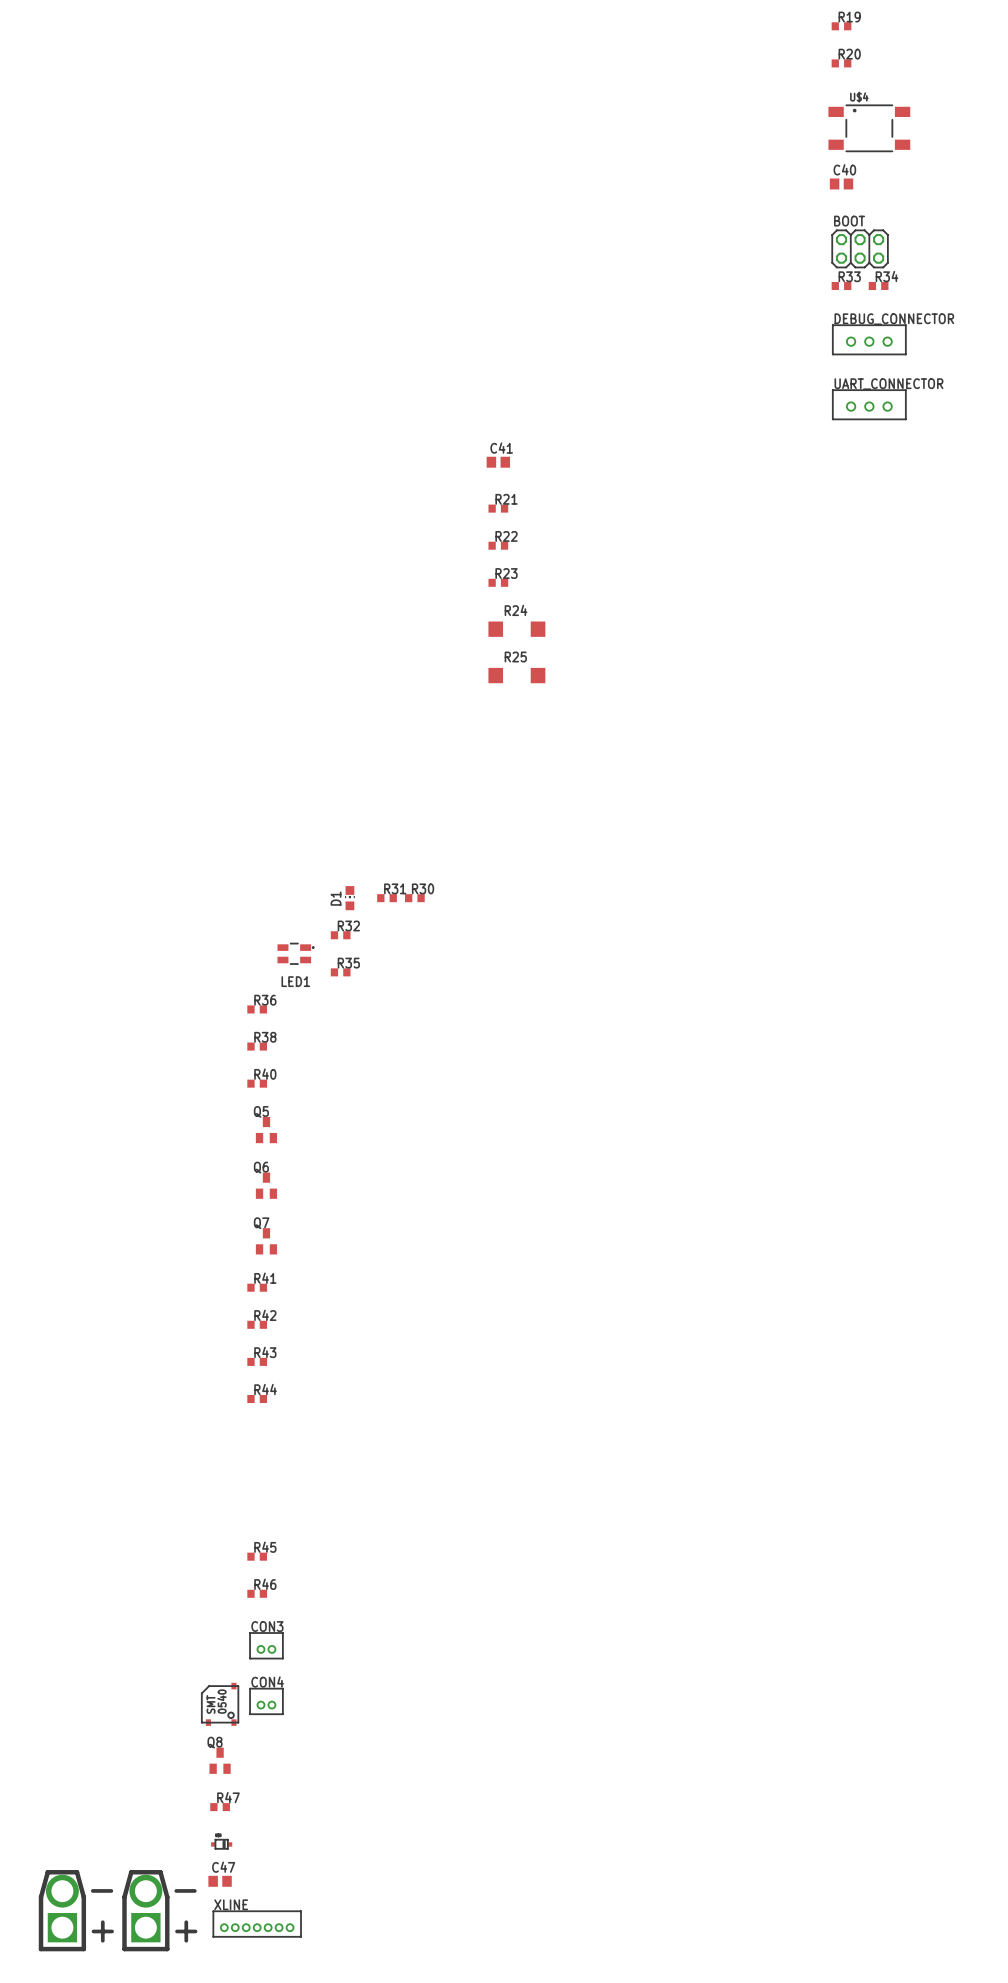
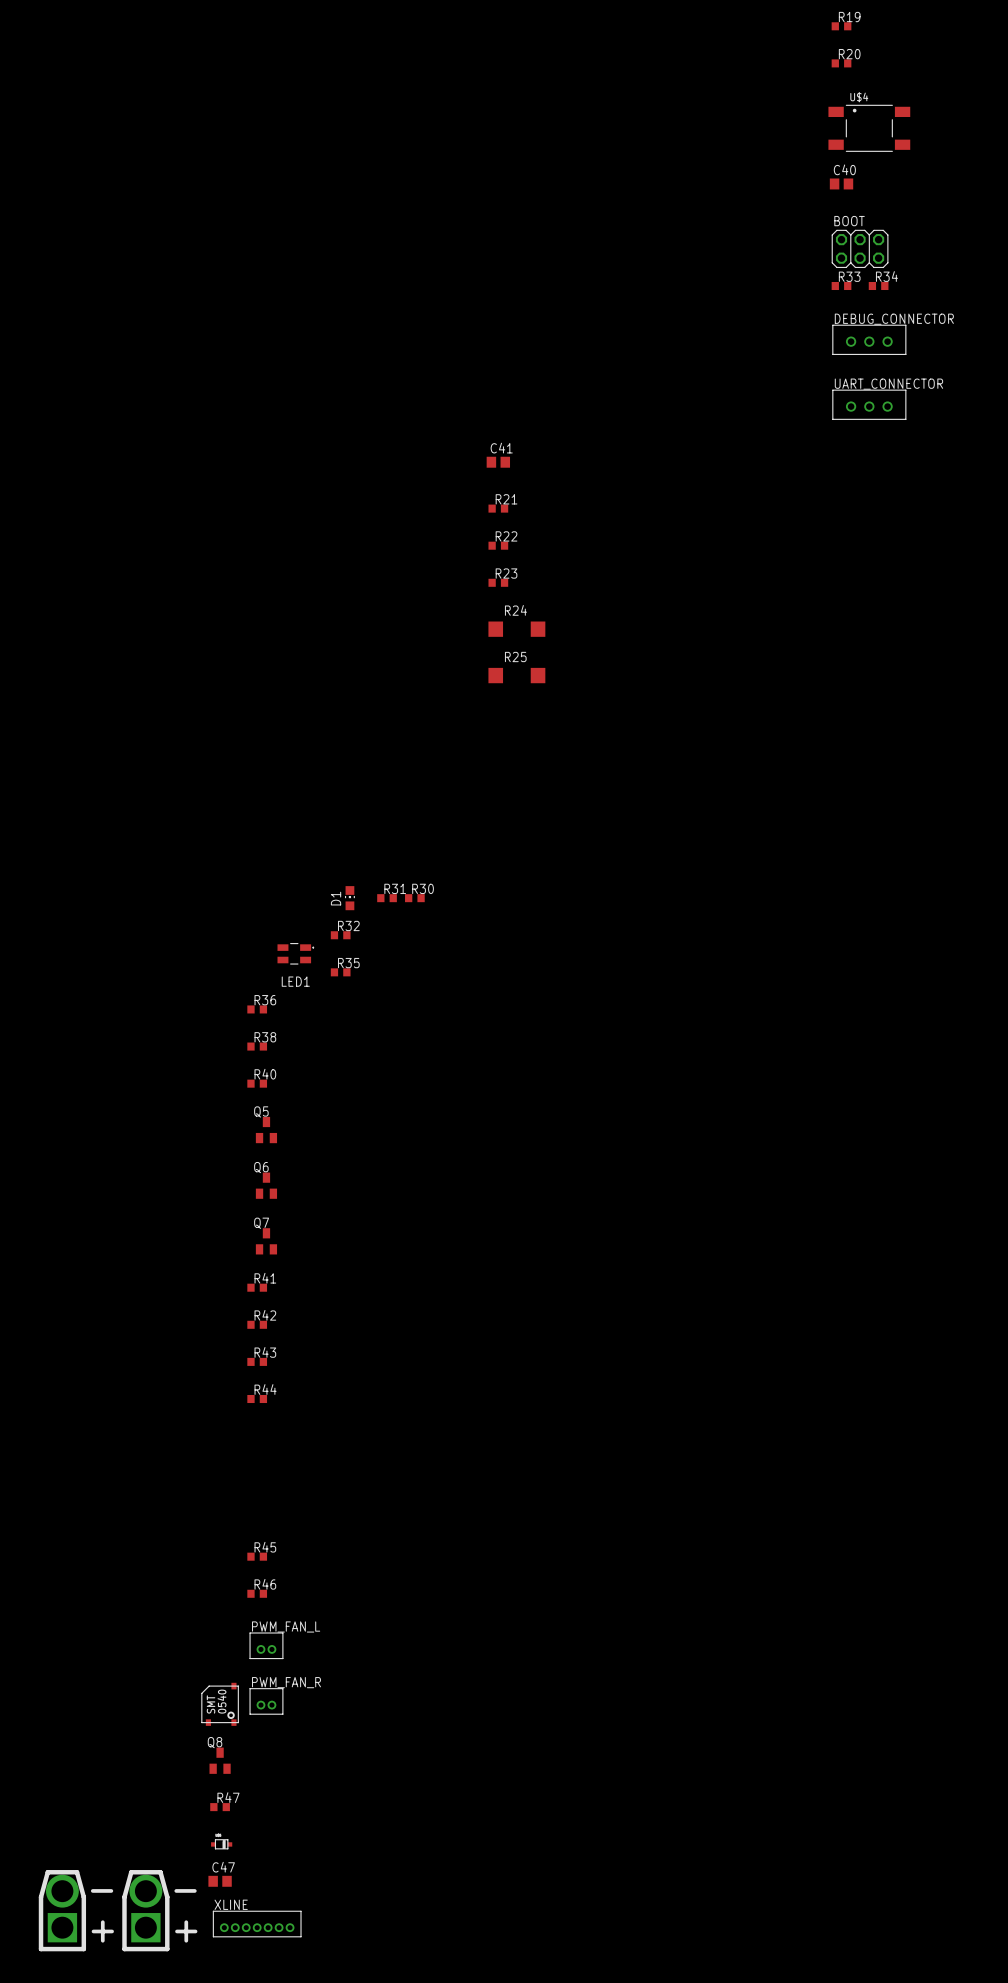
CON3 name: CON3 (267, 1626) -> PWM_FAN_L (286, 1626)
CON4 name: CON4 (267, 1681) -> PWM_FAN_R (286, 1682)

